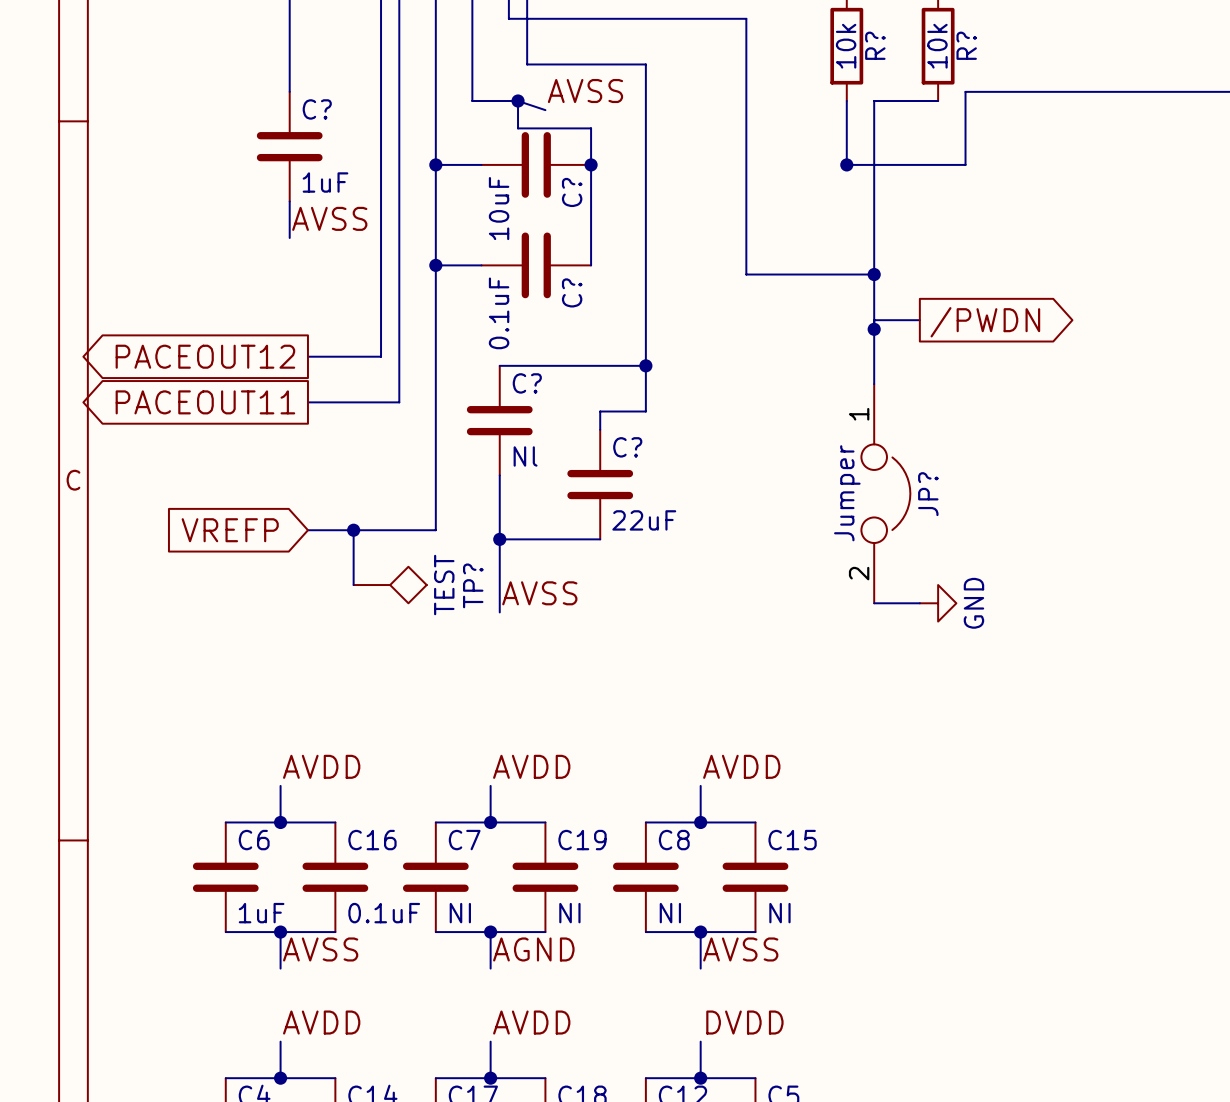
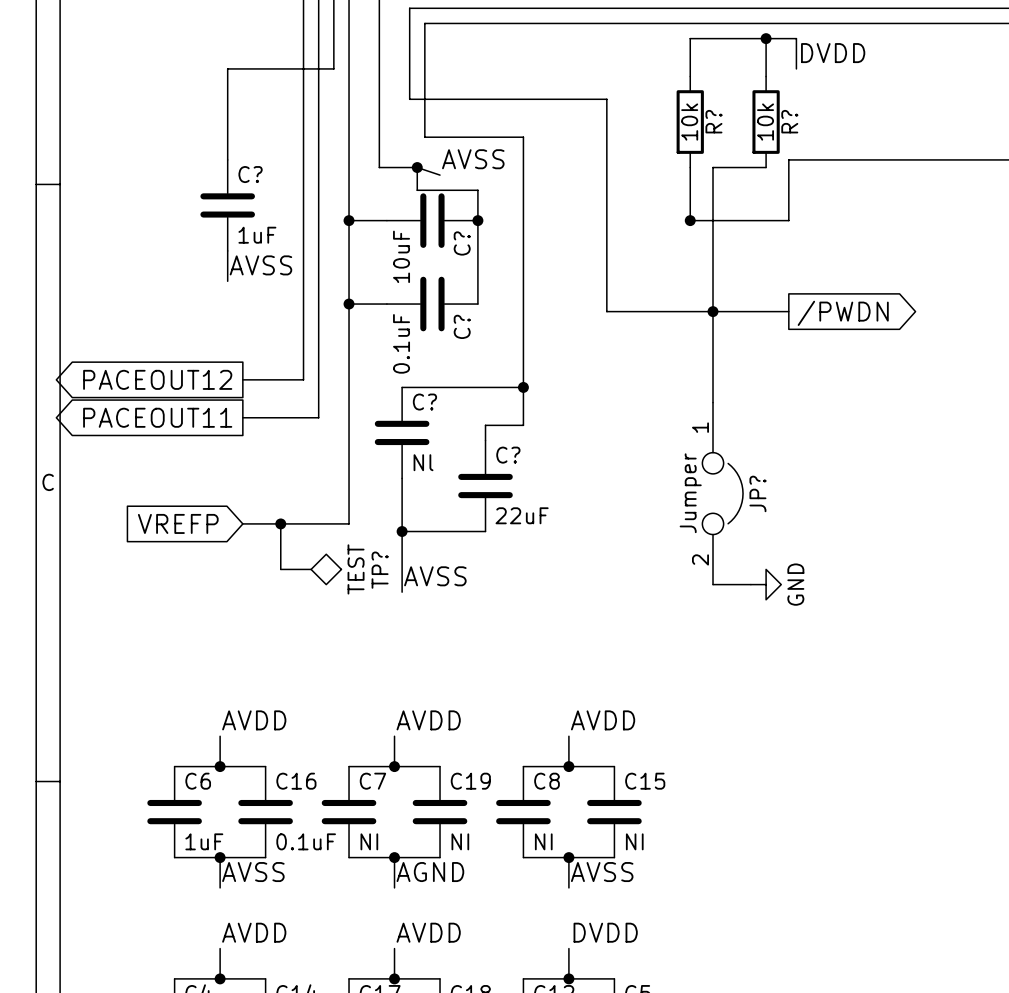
wire: none -> (713, 311) (788, 311)
wire: (874, 320) (919, 320) -> none
global label position: /PWDN (985, 322) -> /PWDN (843, 313)
junction: (874, 329) -> none

